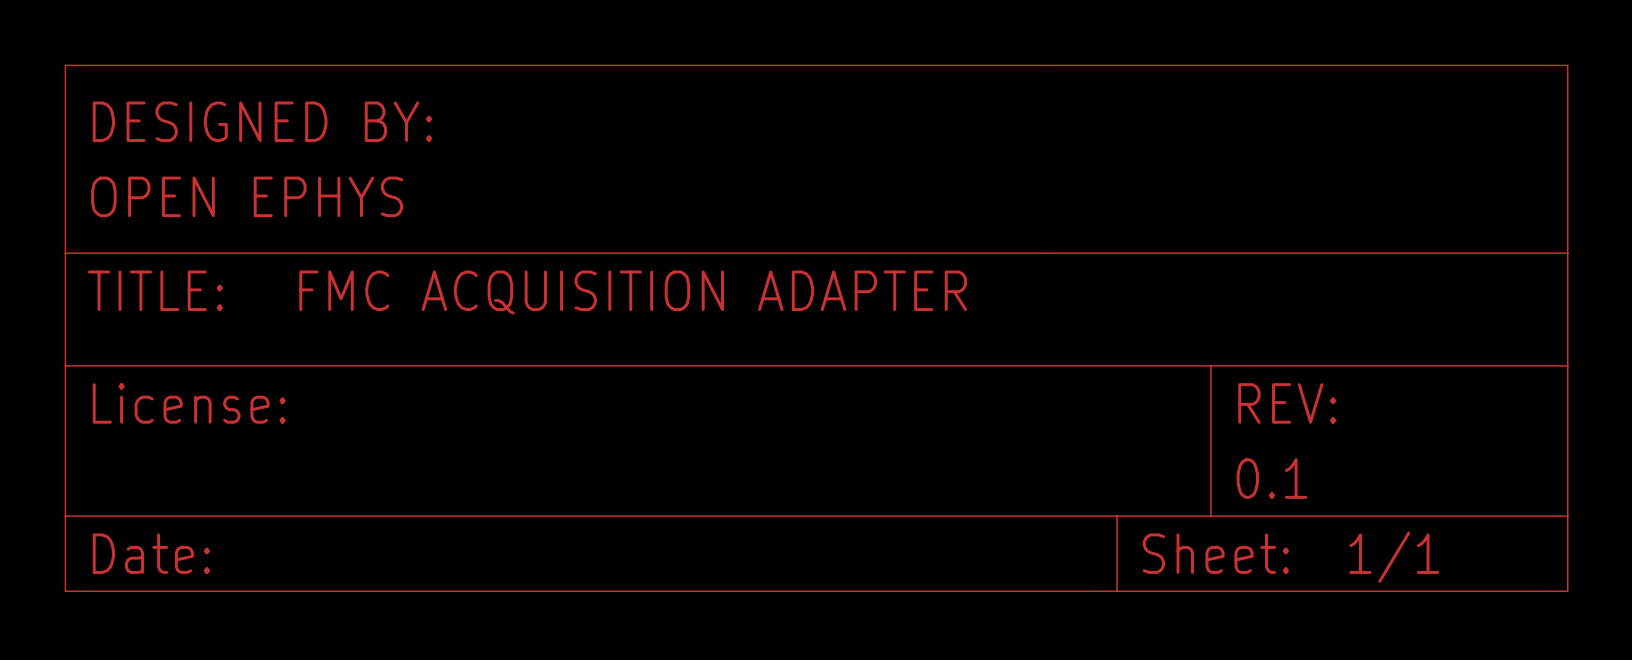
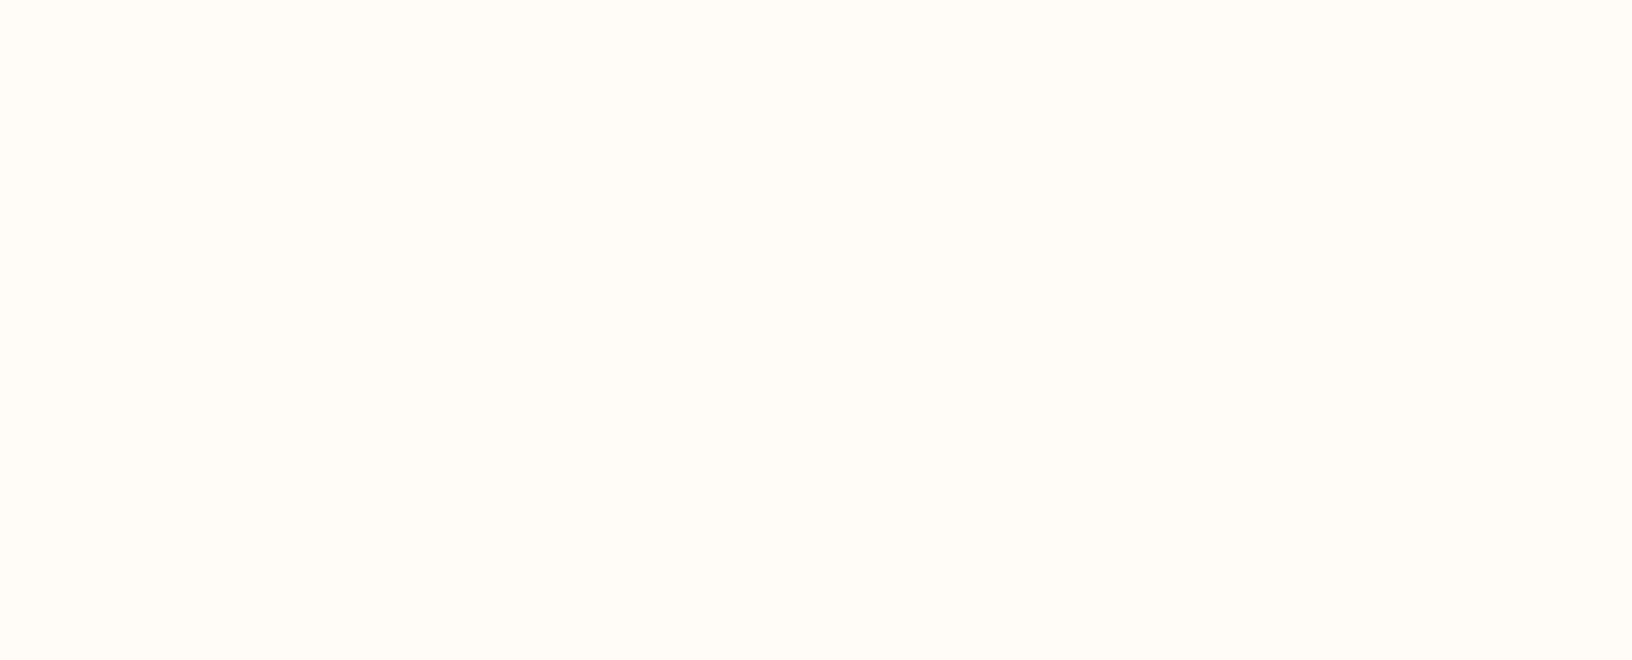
part: (816, 328) -> none

